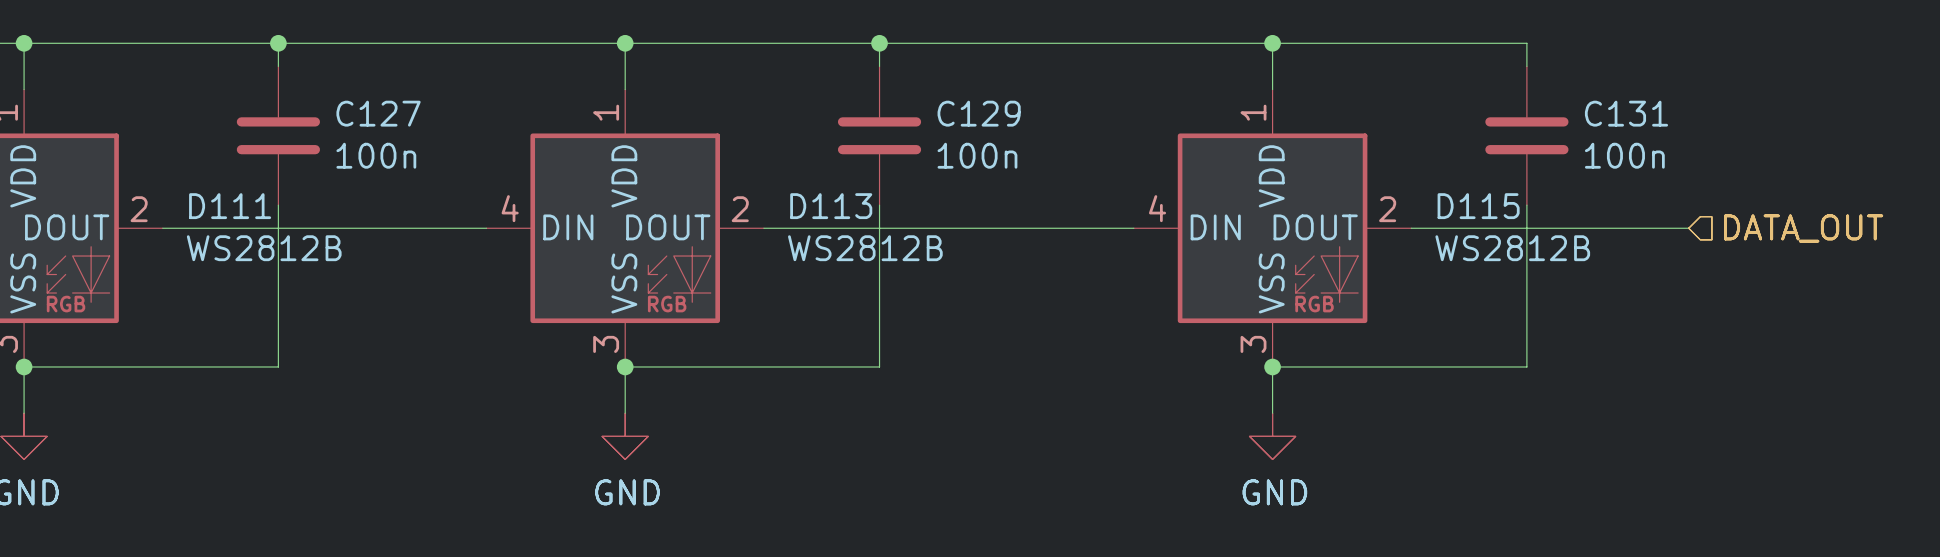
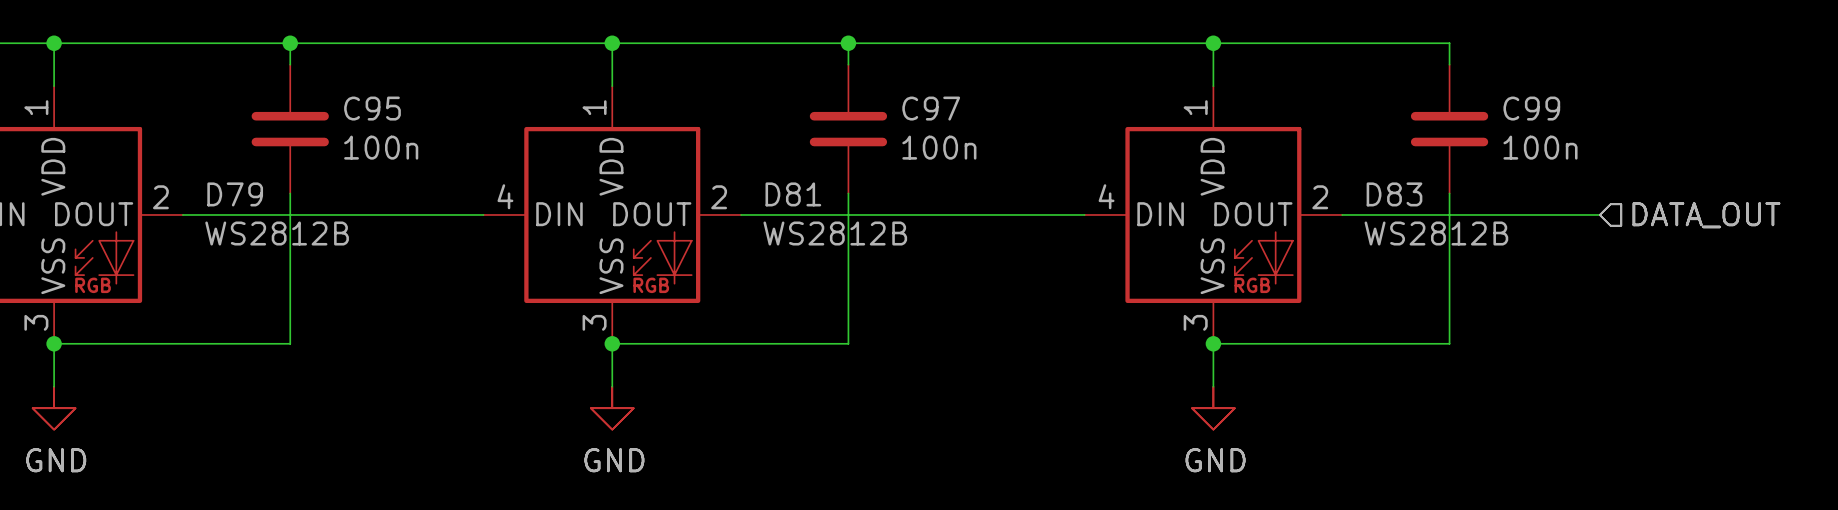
C127 name: C127 (378, 113) -> C95 (372, 108)
C129 name: C129 (979, 113) -> C97 (931, 108)
C131 name: C131 (1626, 113) -> C99 (1531, 108)
D111 name: D111 (230, 206) -> D79 (235, 194)
D113 name: D113 (831, 206) -> D81 (793, 194)
D115 name: D115 (1478, 206) -> D83 (1394, 194)

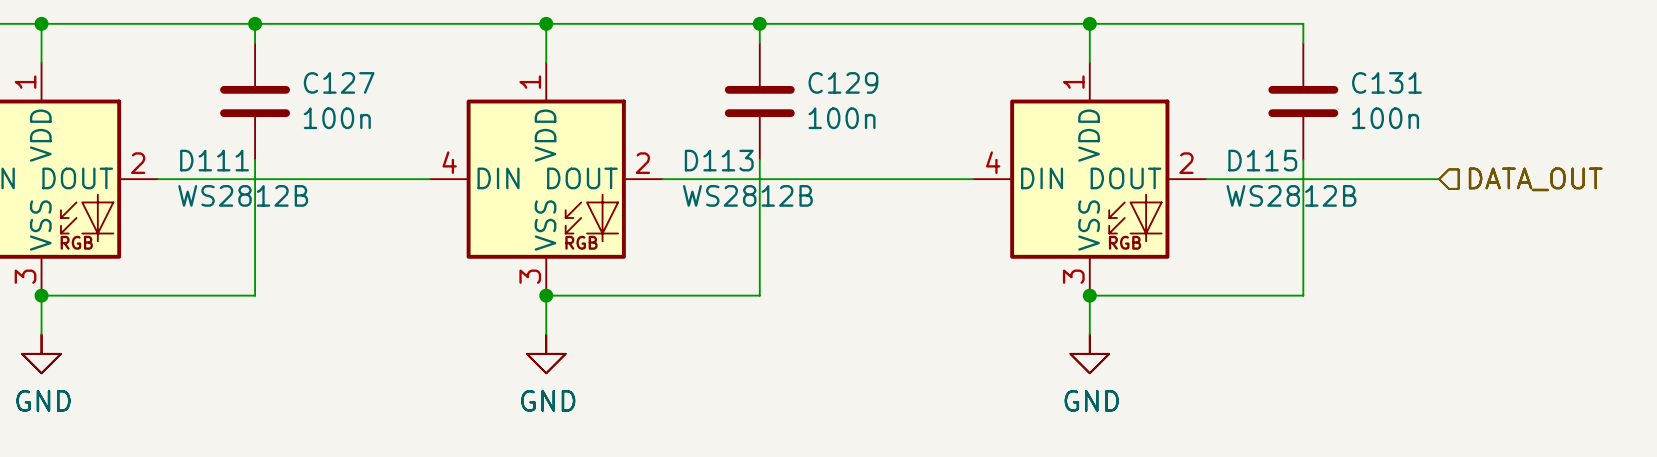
C95 name: C95 (372, 108) -> C127 (339, 82)
C97 name: C97 (931, 108) -> C129 (843, 82)
C99 name: C99 (1531, 108) -> C131 (1386, 82)
D79 name: D79 (235, 194) -> D111 (214, 160)
D81 name: D81 (793, 194) -> D113 (719, 160)
D83 name: D83 (1394, 194) -> D115 (1262, 160)

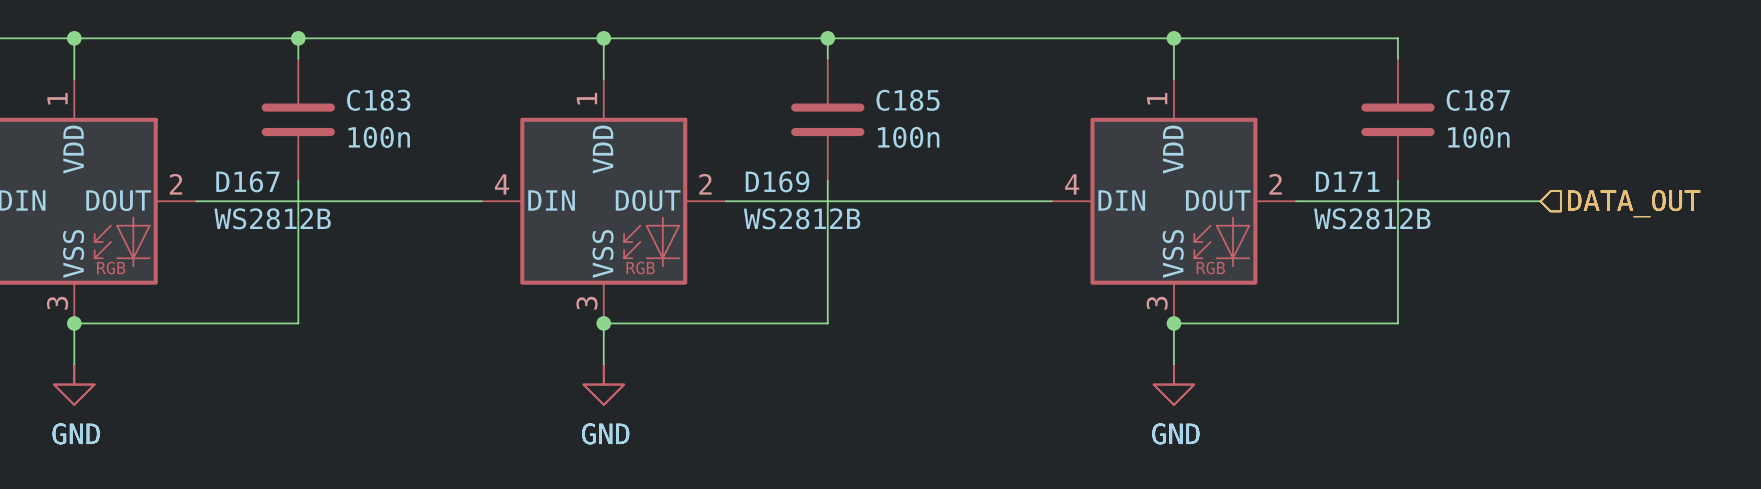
C127 name: C127 (339, 82) -> C183 (378, 100)
C129 name: C129 (843, 82) -> C185 (908, 100)
C131 name: C131 (1386, 82) -> C187 (1478, 100)
D111 name: D111 (214, 160) -> D167 (247, 181)
D113 name: D113 (719, 160) -> D169 (777, 181)
D115 name: D115 (1262, 160) -> D171 (1347, 181)

